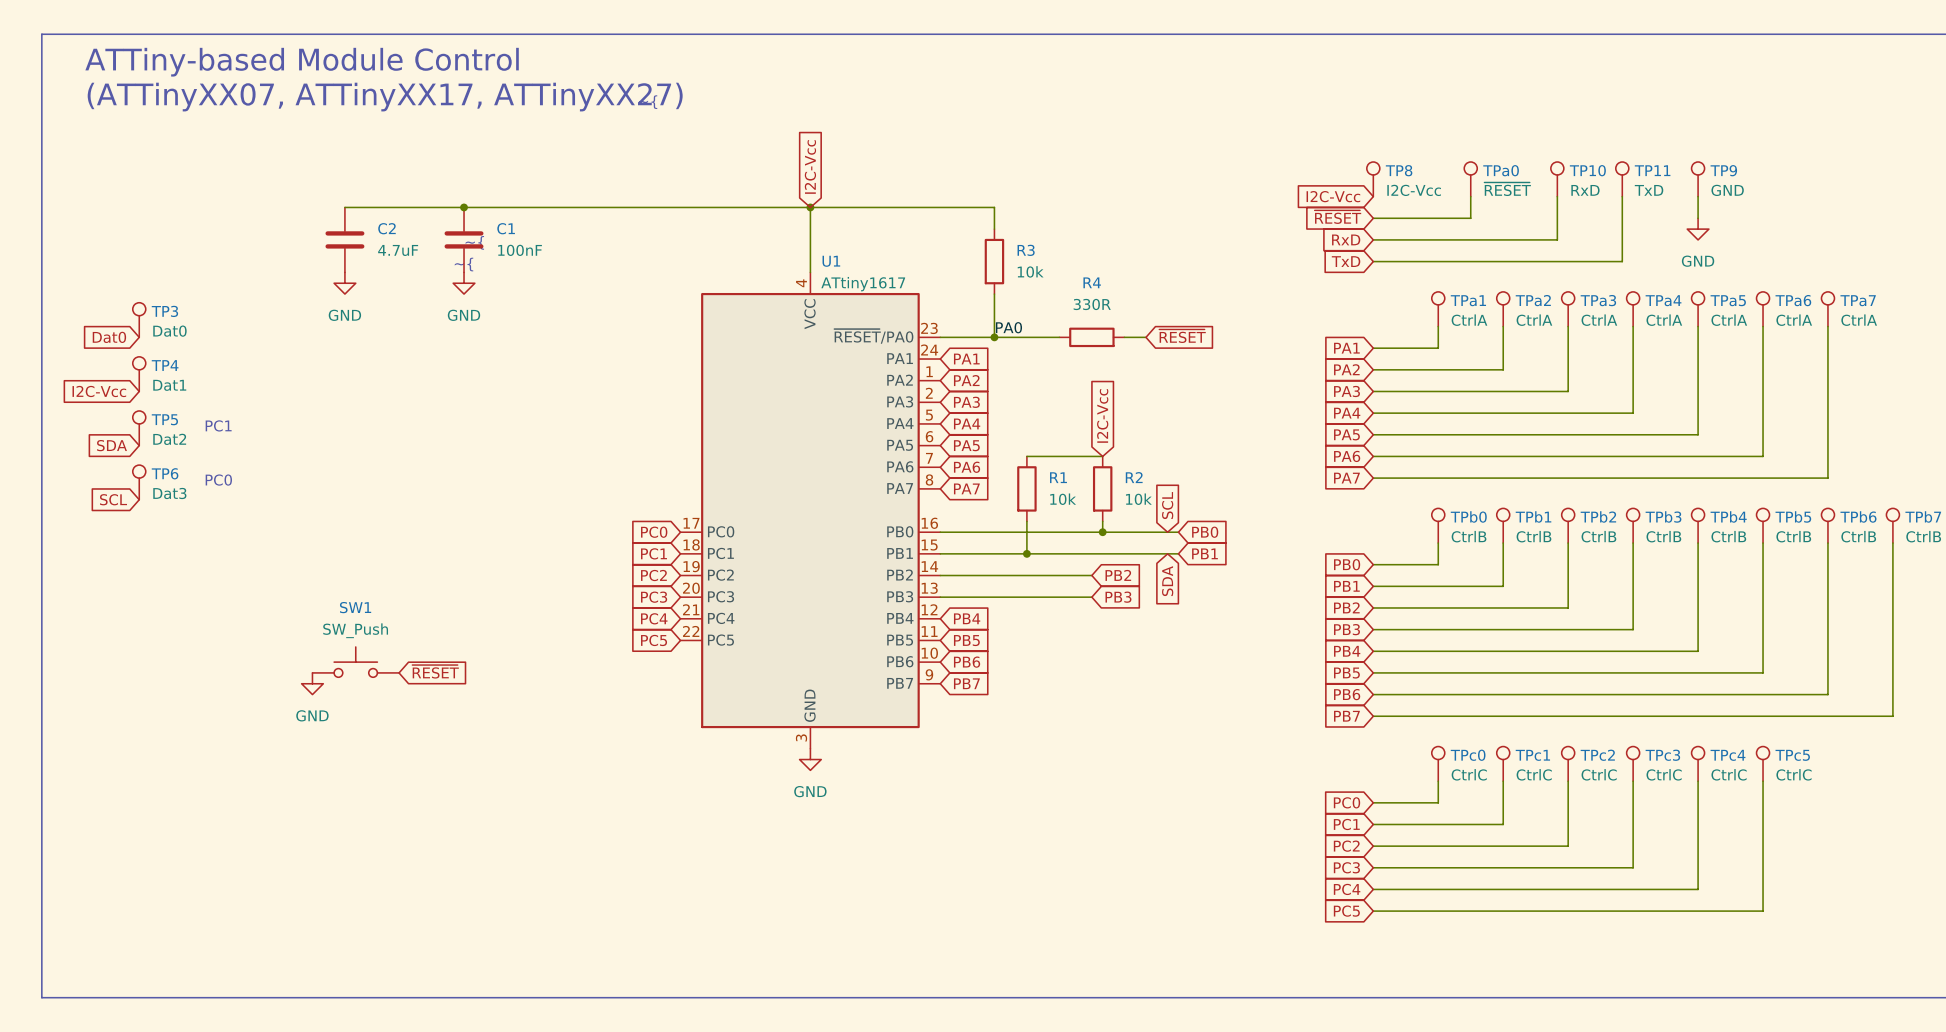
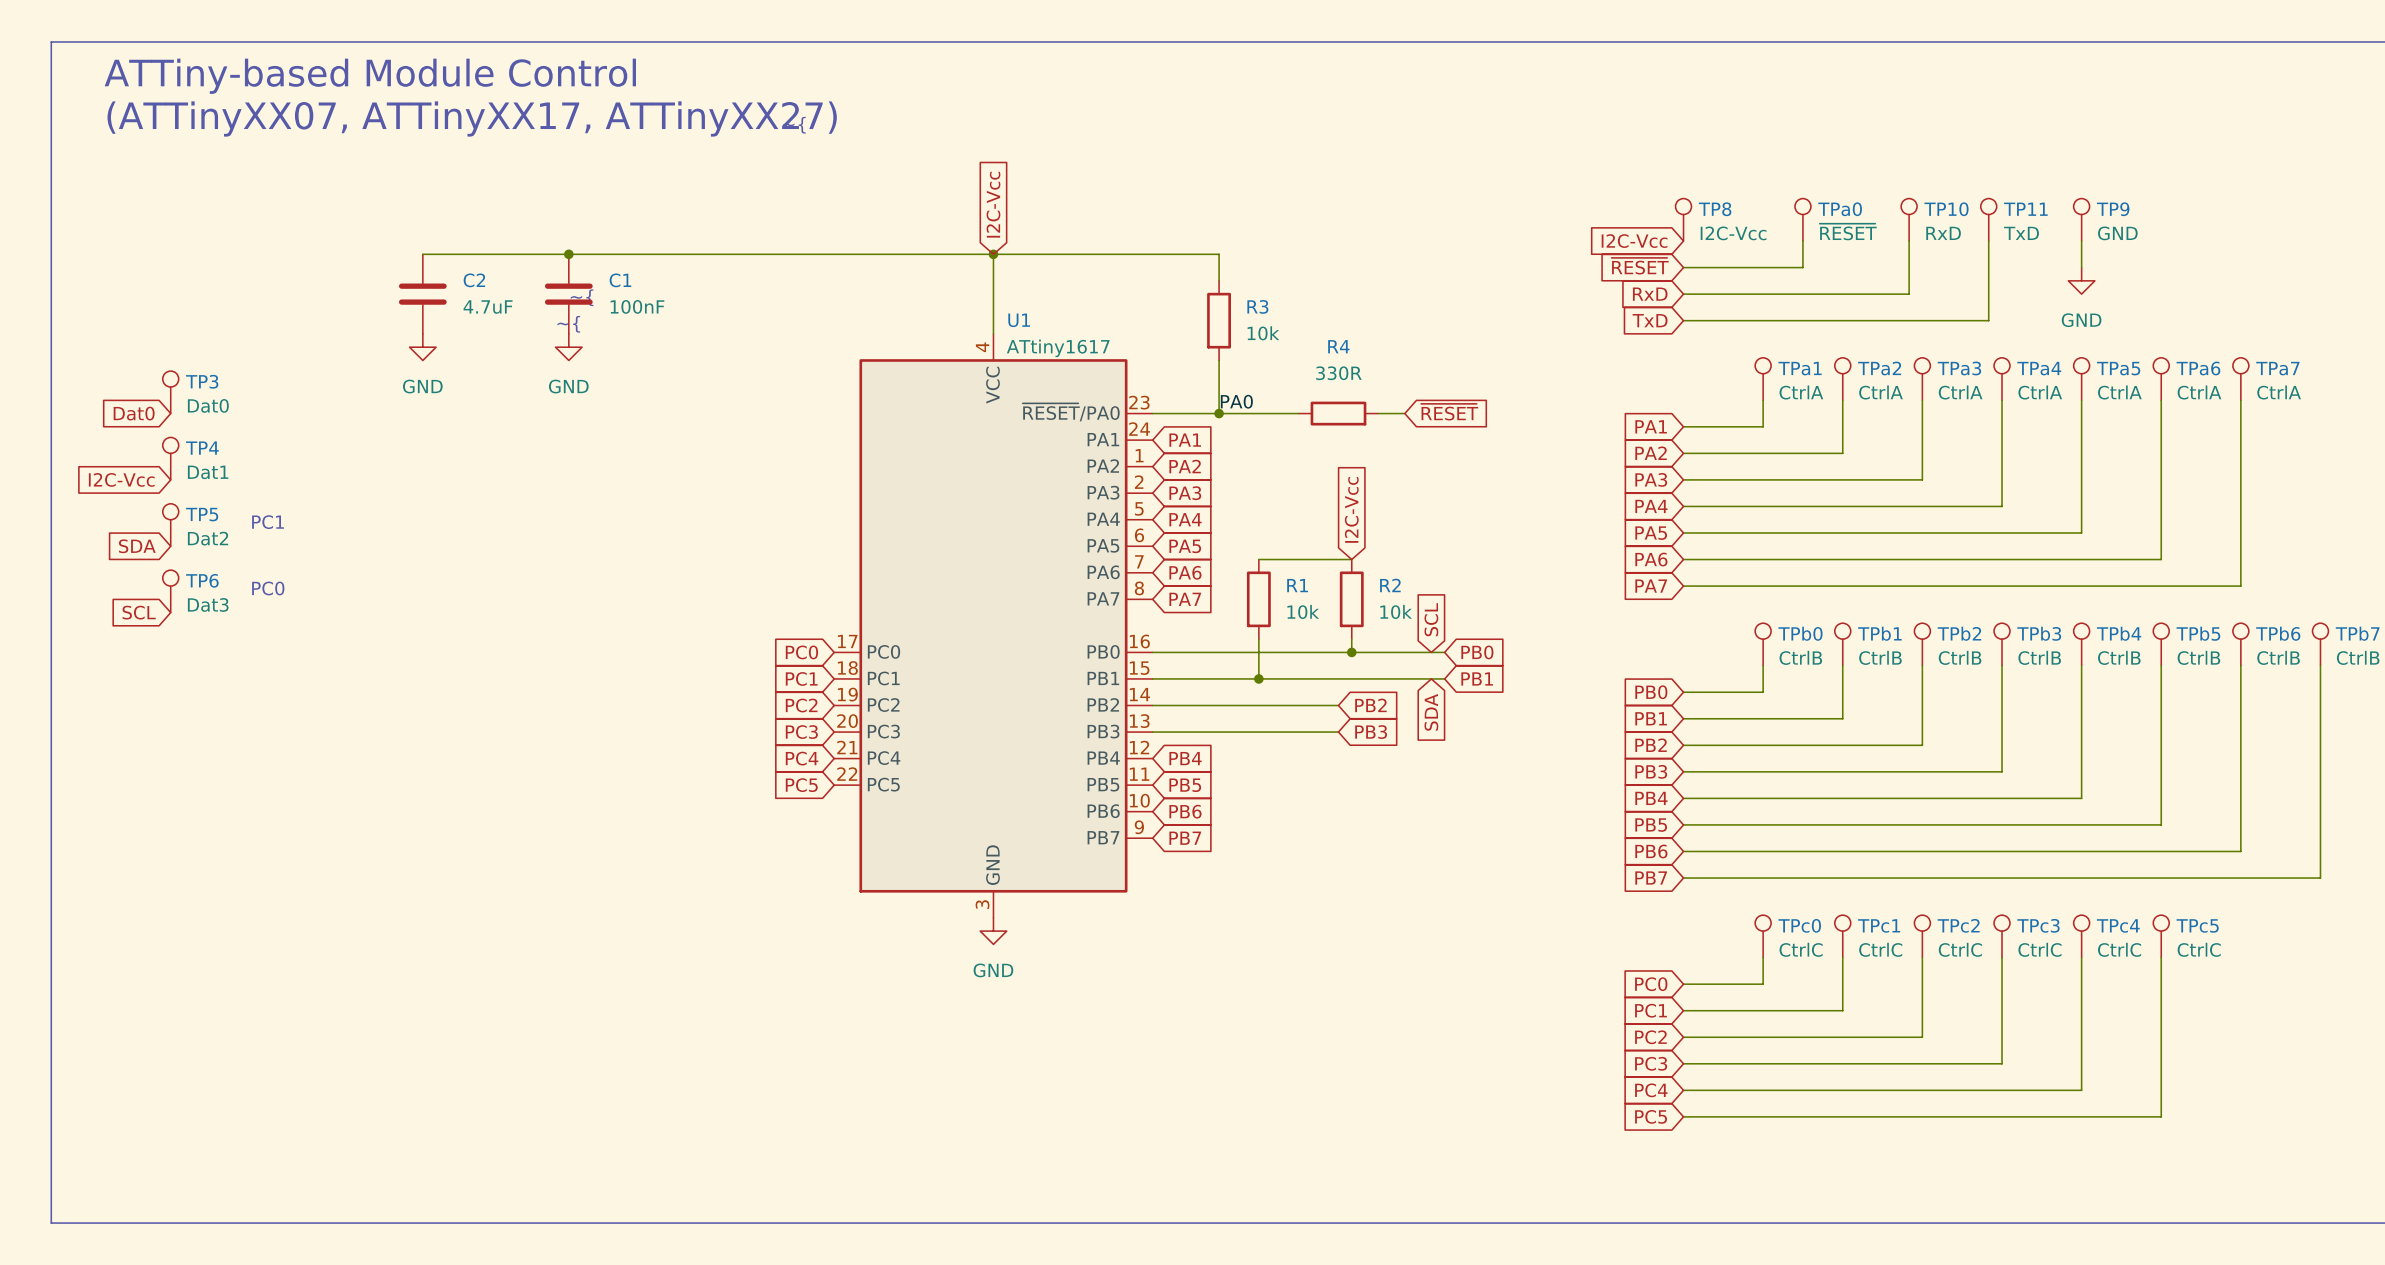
SW1: SW_Push (355, 662) -> none
global label: ~{RESET} (435, 671) -> none
power symbol: GND (312, 683) -> none

